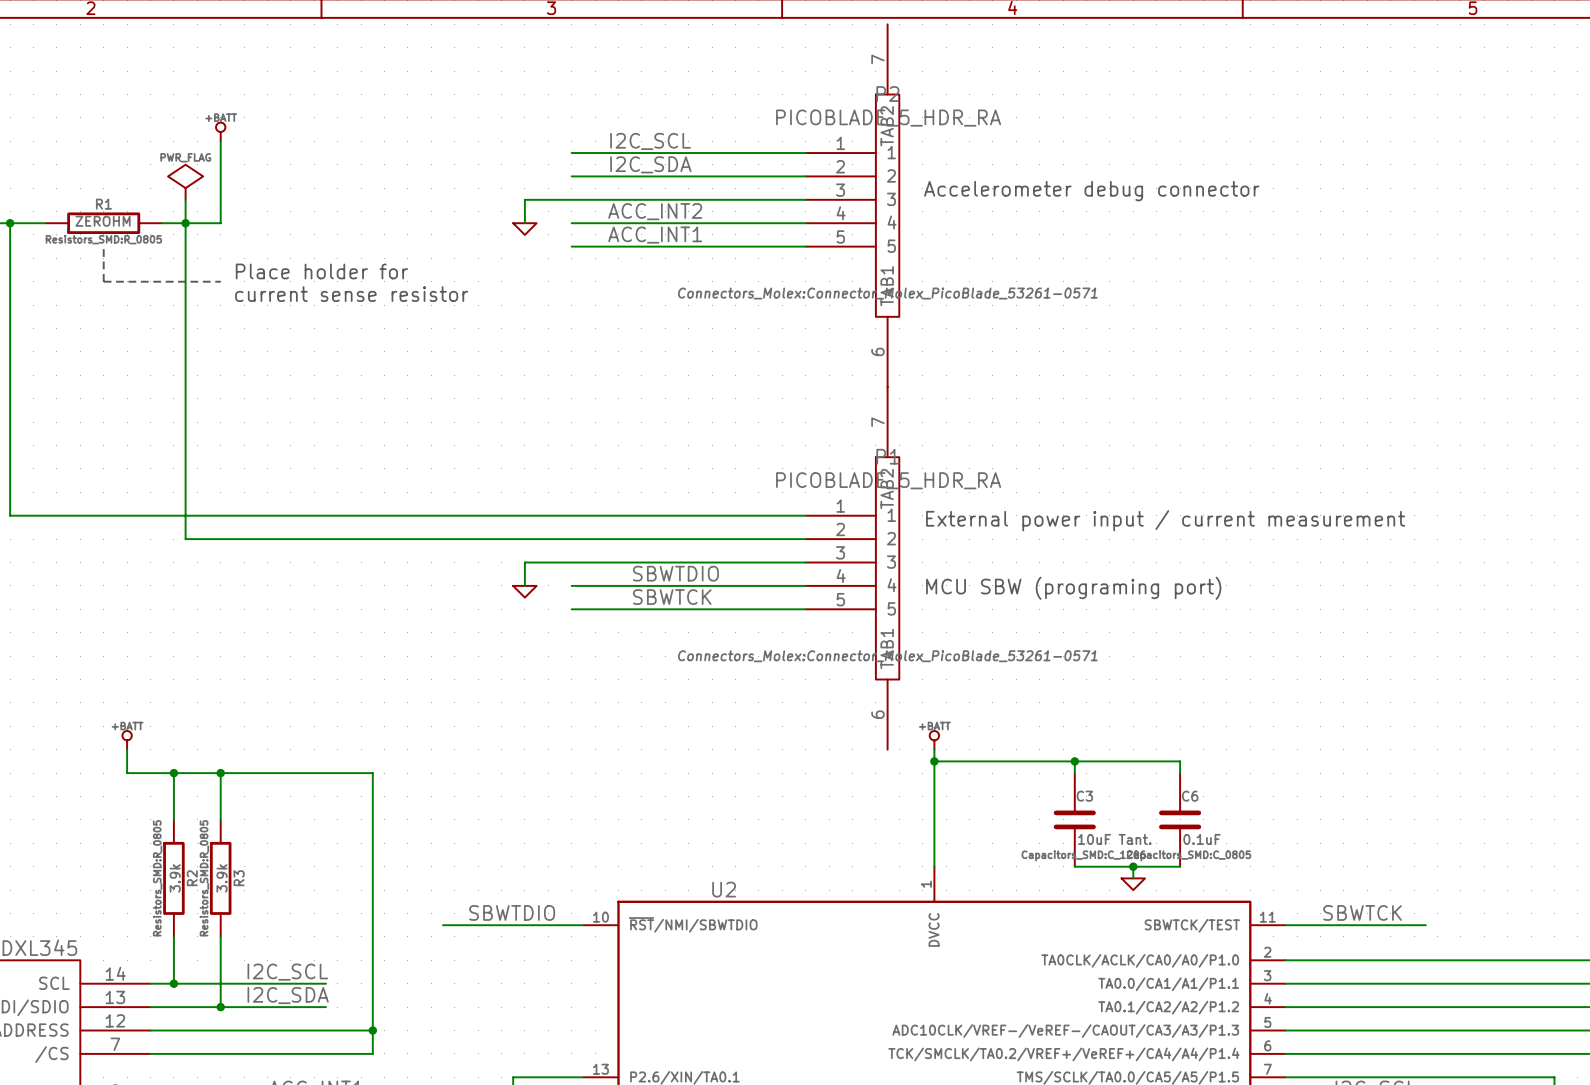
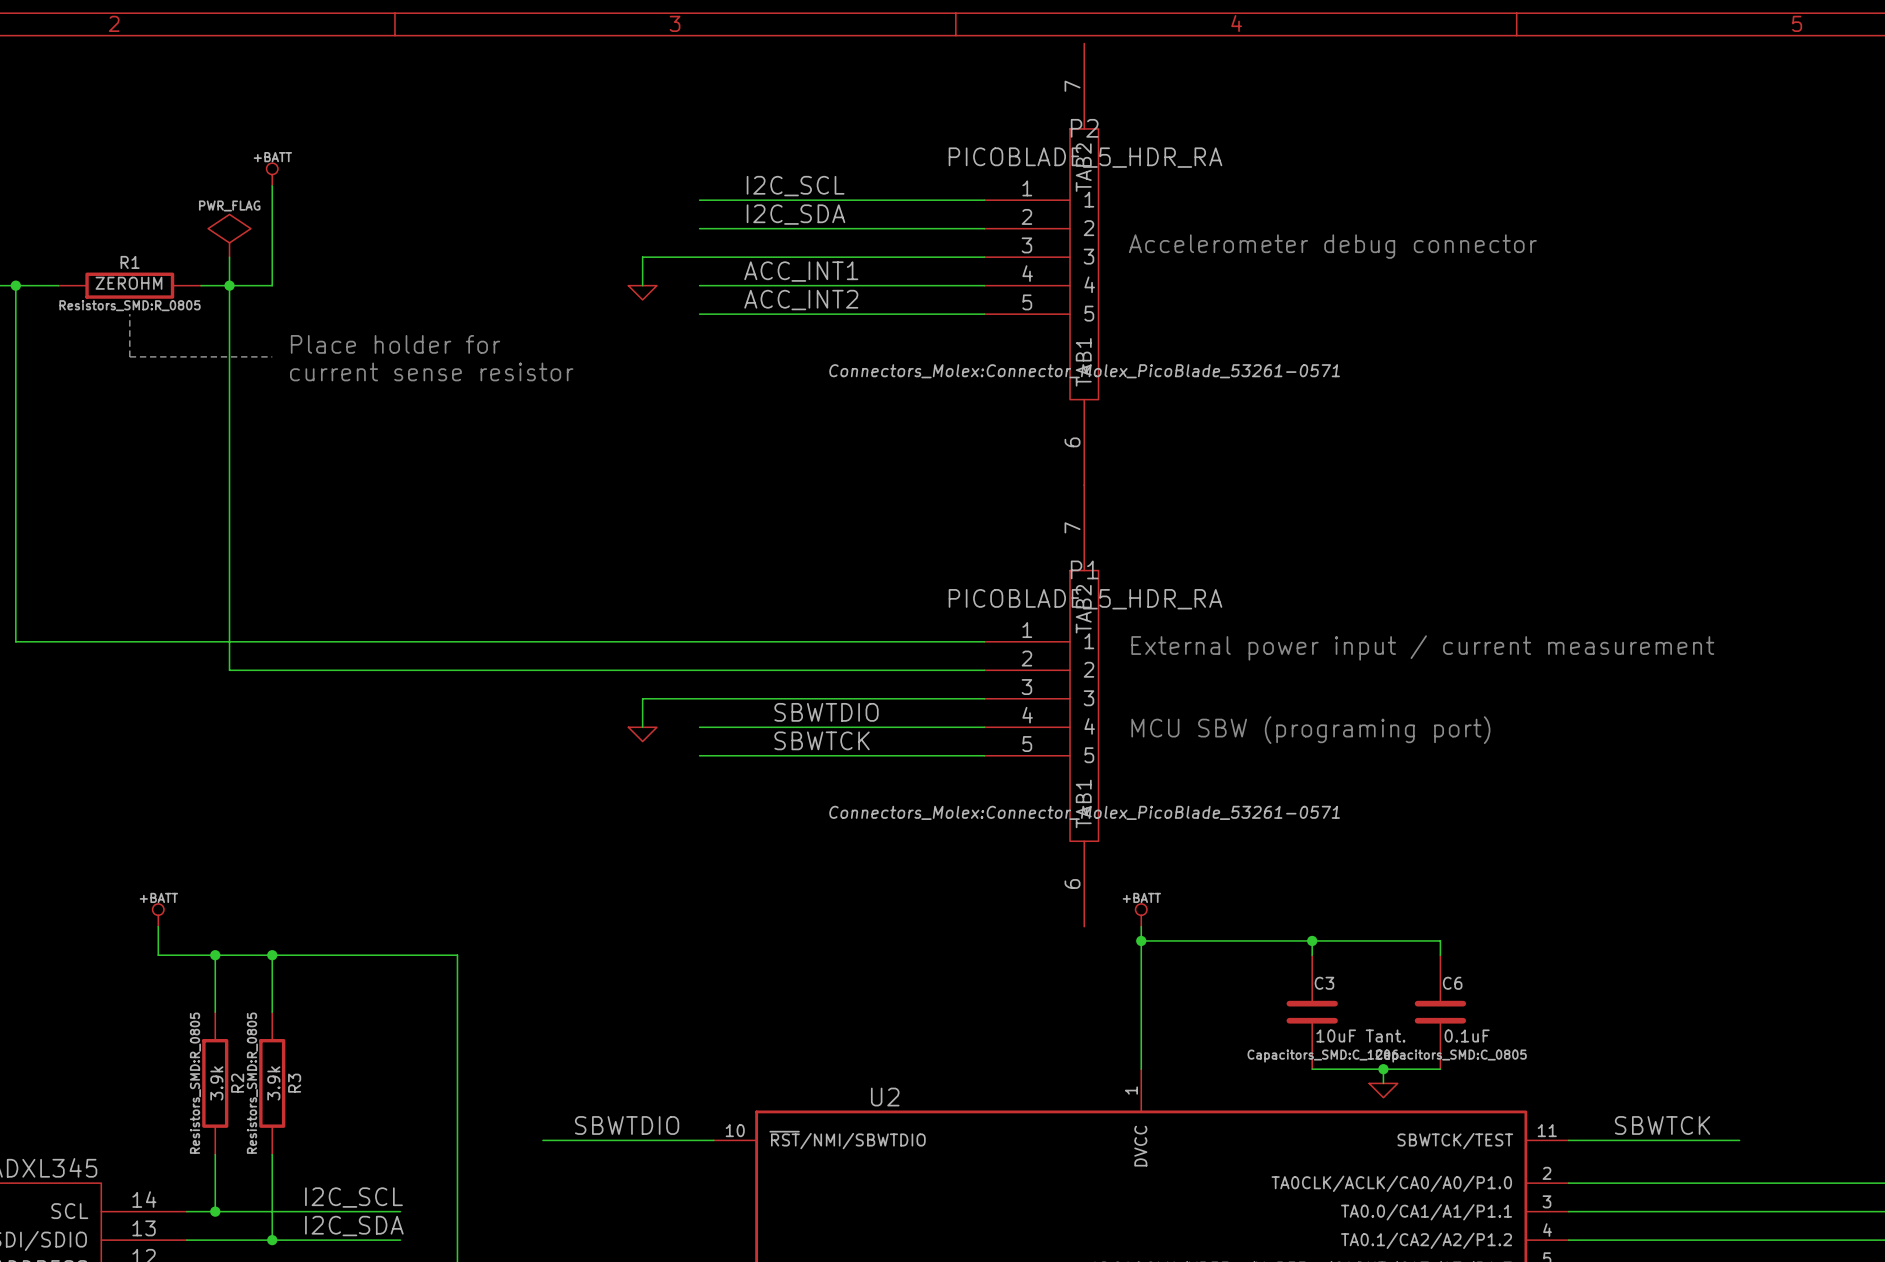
label: ACC_INT2 (655, 211) -> ACC_INT1 (801, 271)
label: ACC_INT1 (655, 235) -> ACC_INT2 (801, 300)

